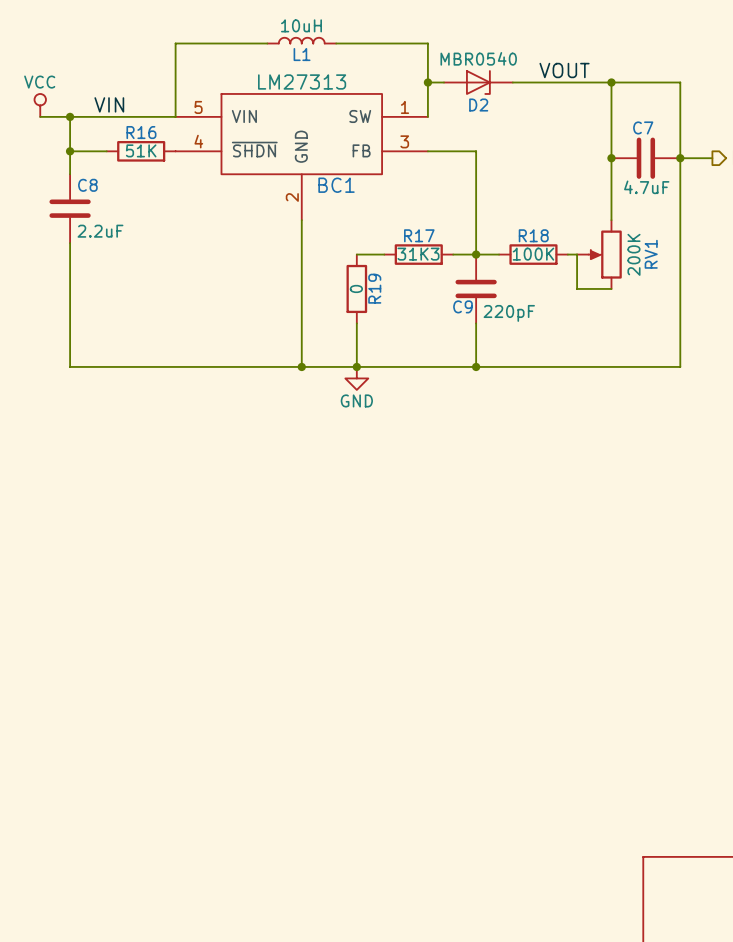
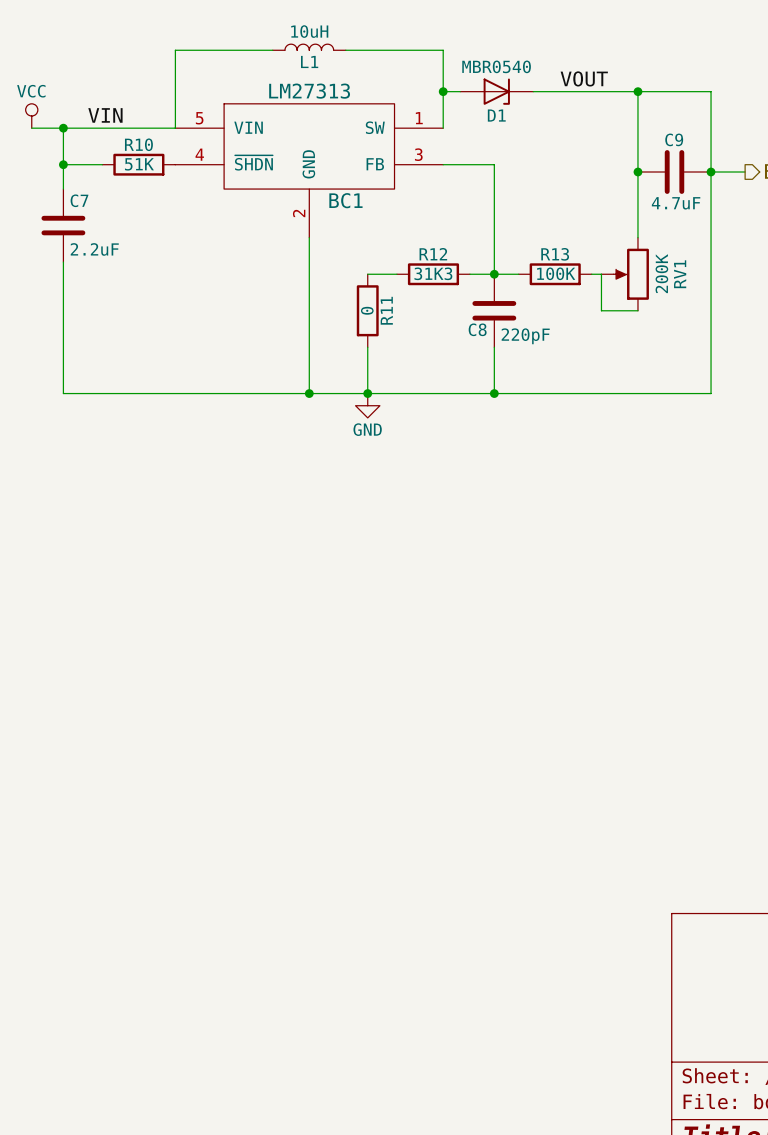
D2 name: D2 (478, 105) -> D1 (496, 115)
C7 name: C7 (643, 127) -> C9 (674, 139)
R16 name: R16 (141, 132) -> R10 (138, 144)
C8 name: C8 (87, 185) -> C7 (79, 200)
R17 name: R17 (419, 235) -> R12 (433, 254)
R18 name: R18 (533, 235) -> R13 (555, 254)
R19 name: R19 (374, 288) -> R11 (386, 310)
C9 name: C9 (462, 306) -> C8 (477, 329)

